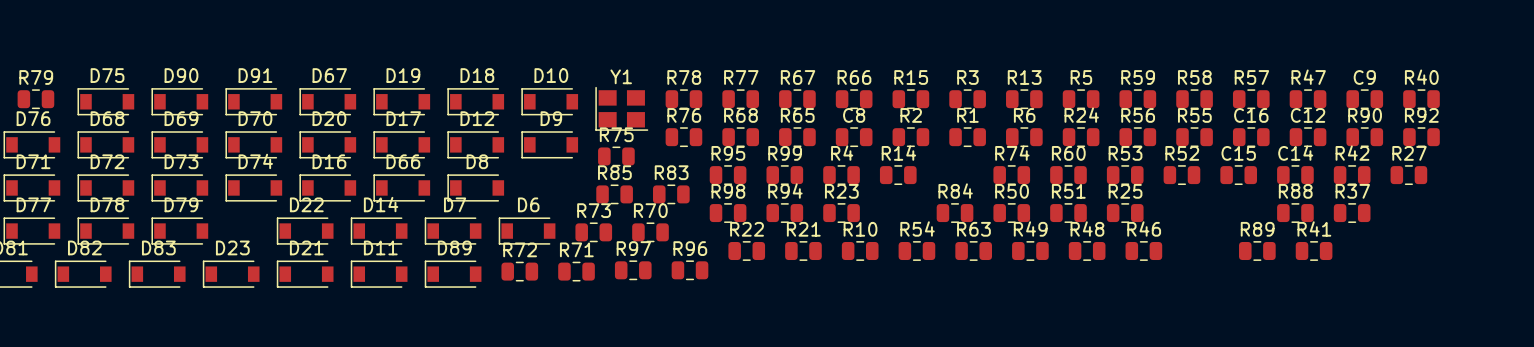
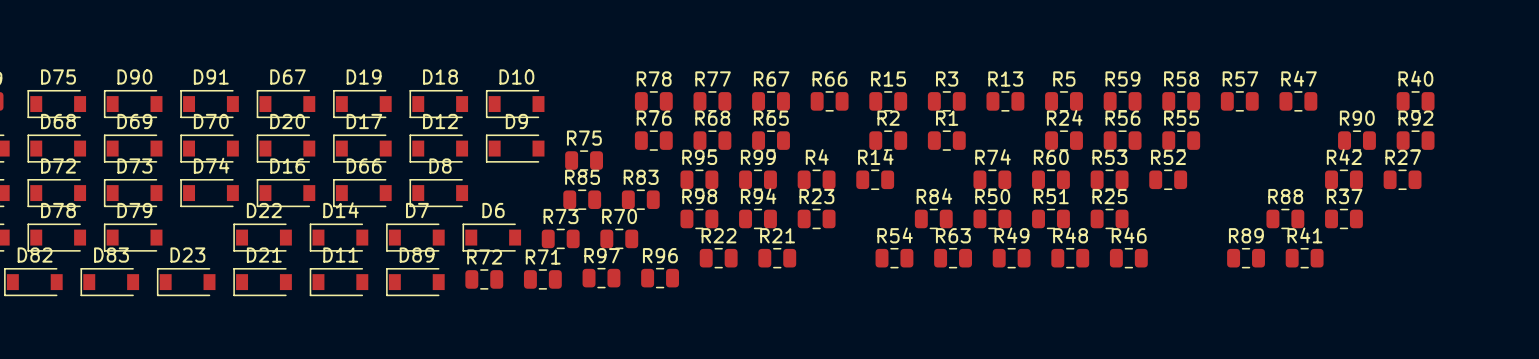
C9: (1364, 99) -> none
Y1: (621, 108) -> none
C8: (854, 137) -> none
R6: (1024, 137) -> none
C16: (1251, 137) -> none
C12: (1308, 137) -> none
C15: (1238, 175) -> none
C14: (1295, 175) -> none
R10: (860, 251) -> none

